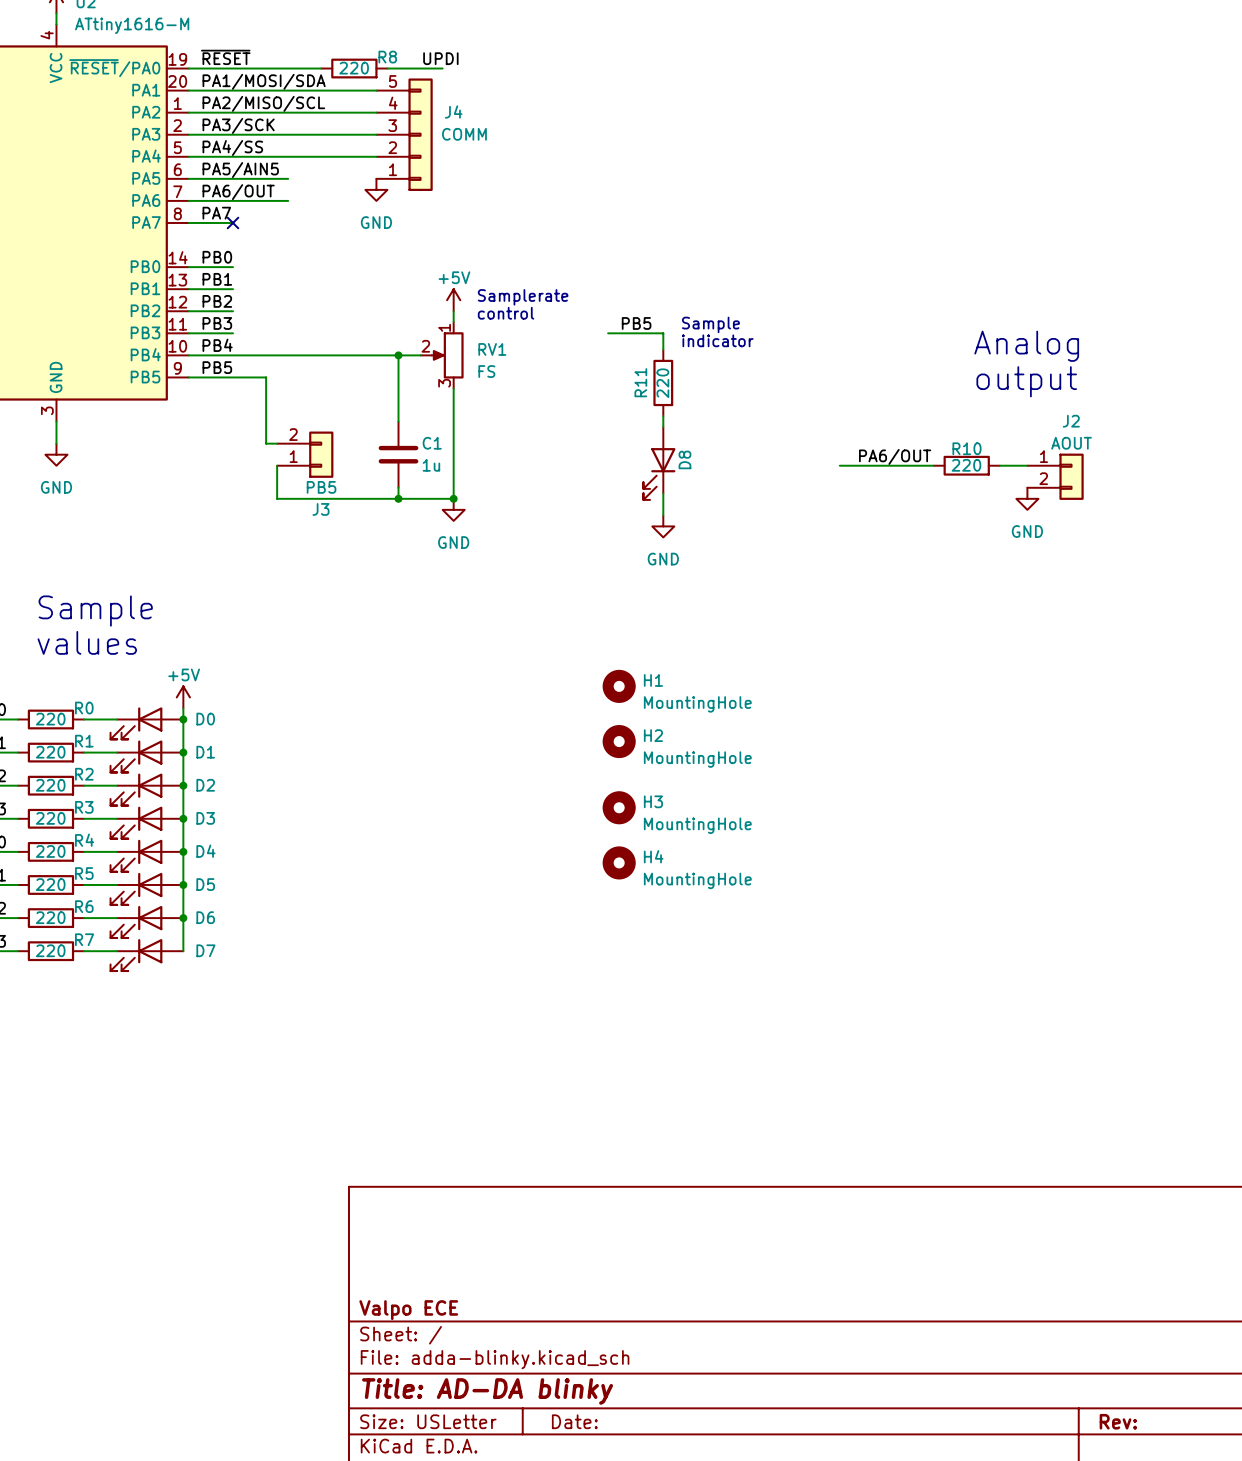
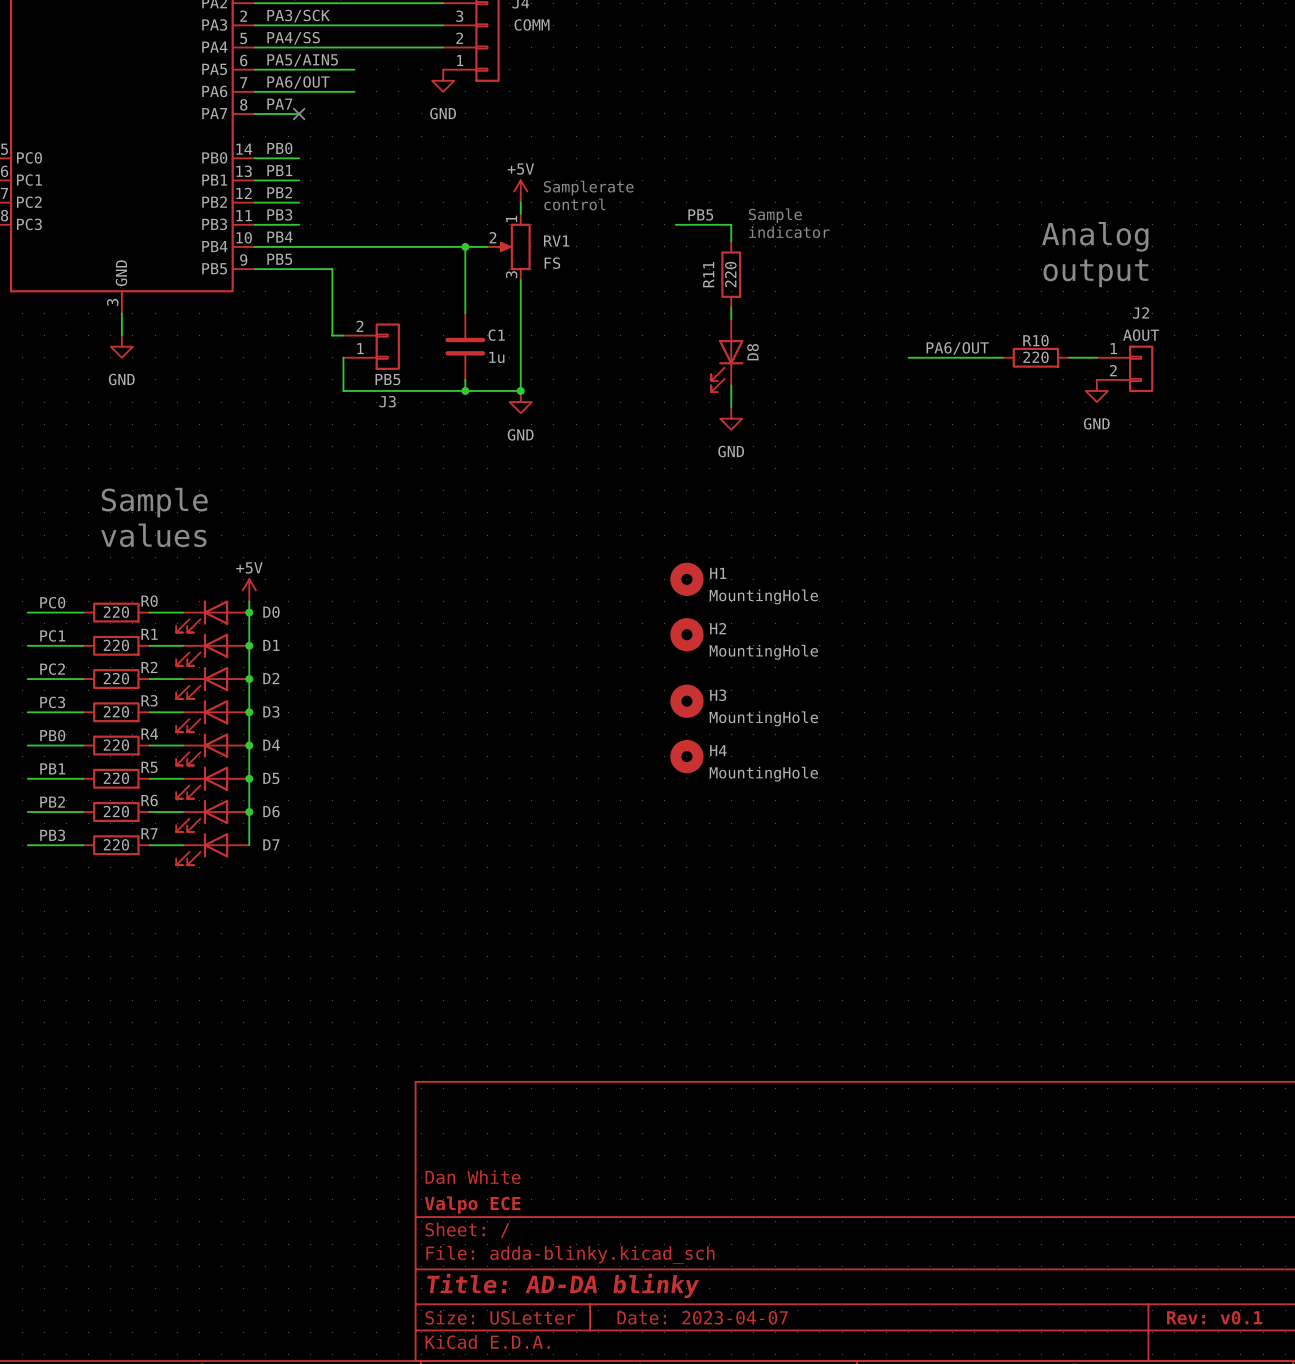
title block: none -> Dan White (473, 1177)
title block: Date: (574, 1421) -> Date: 2023-04-07 (702, 1317)
title block: Rev: (1118, 1421) -> Rev: v0.1 (1214, 1317)

